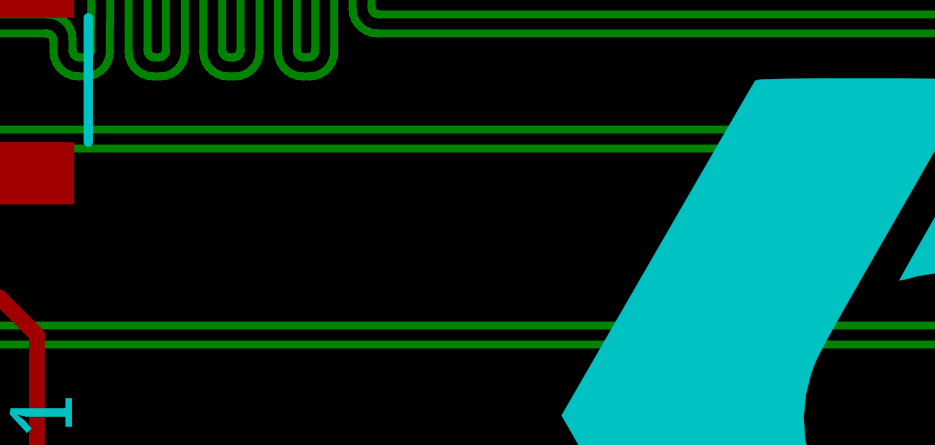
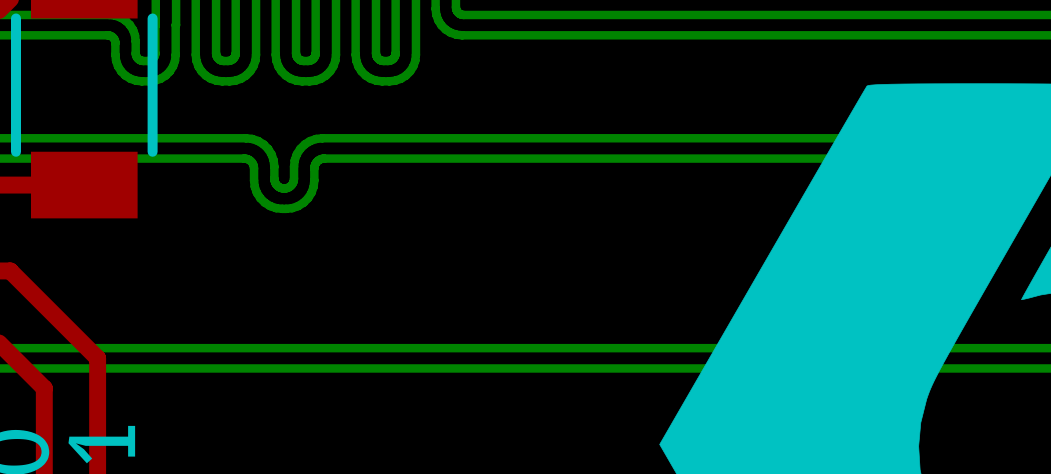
bottom track: (175, 129) (246, 129) -> (245, 138) (258, 141) (268, 148) (273, 160) (275, 182) (284, 188) (293, 182) (294, 160) (300, 148) (310, 141) (322, 138)
bottom track: (173, 148) (248, 148) -> (244, 158) (253, 164) (254, 186) (260, 198) (270, 206) (282, 208) (298, 206) (308, 198) (313, 186) (315, 164) (324, 158)

